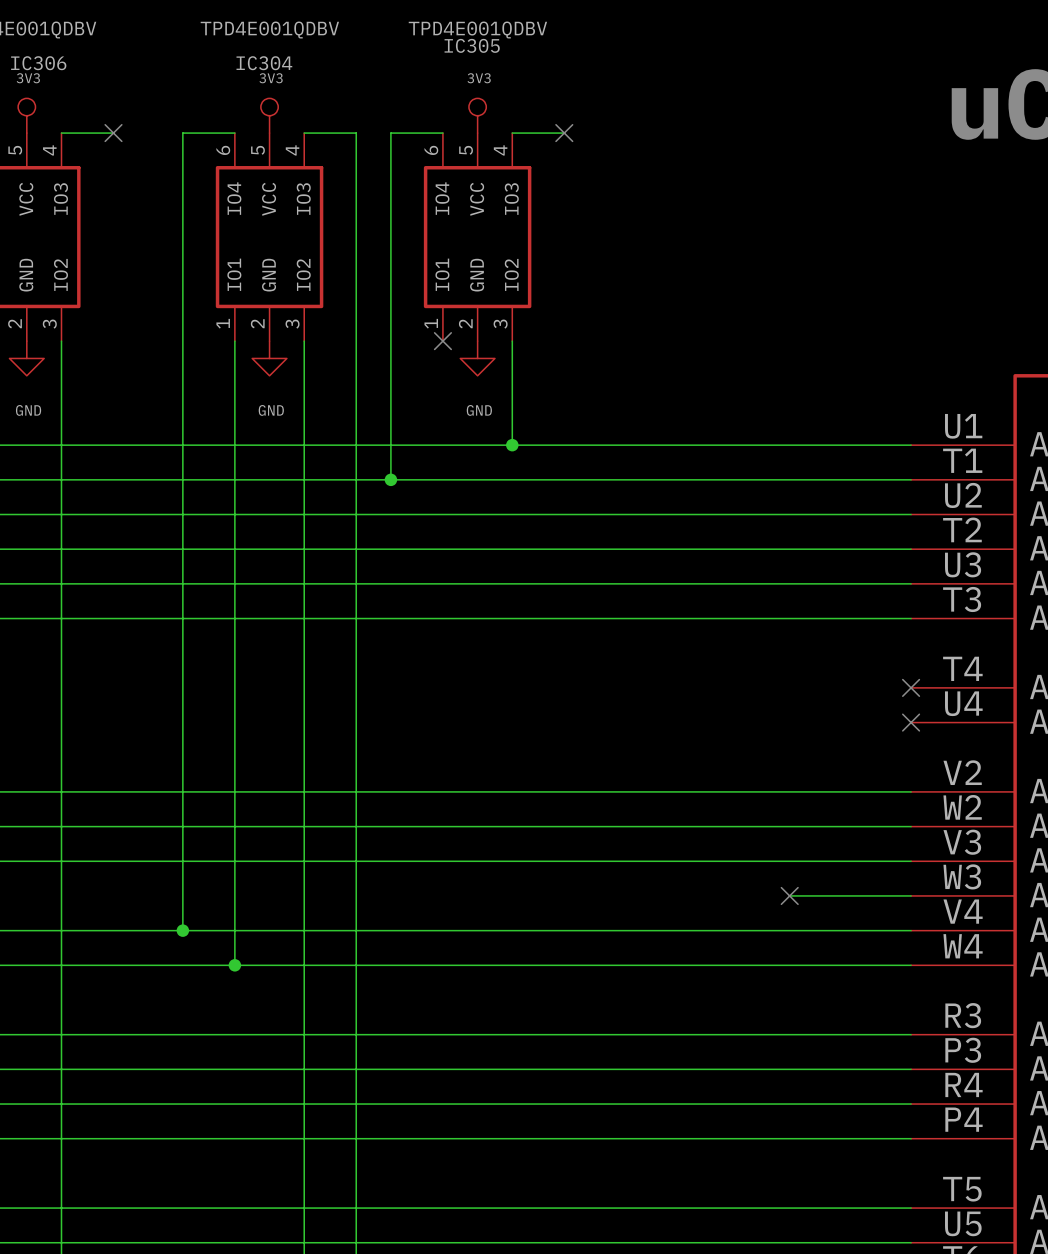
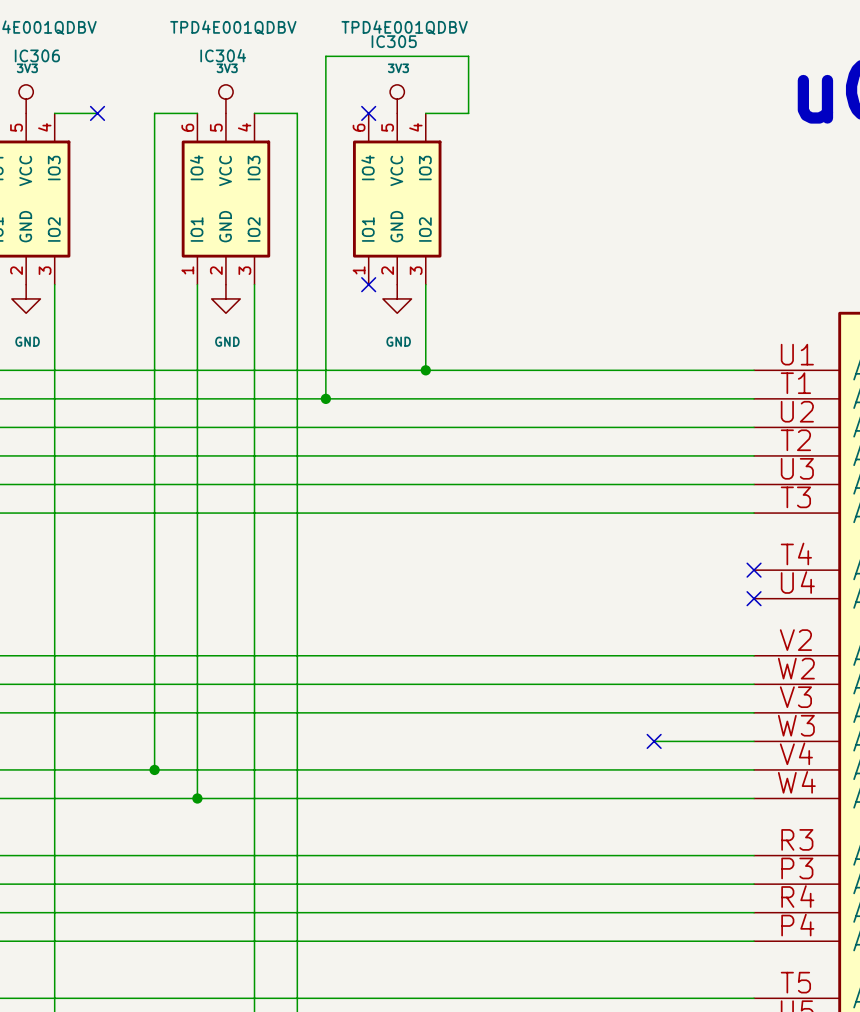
wire: (390, 133) (442, 133) -> (325, 113) (325, 56) (468, 56) (468, 113)
no-connect mark: none -> (368, 113)
no-connect mark: (564, 133) -> none

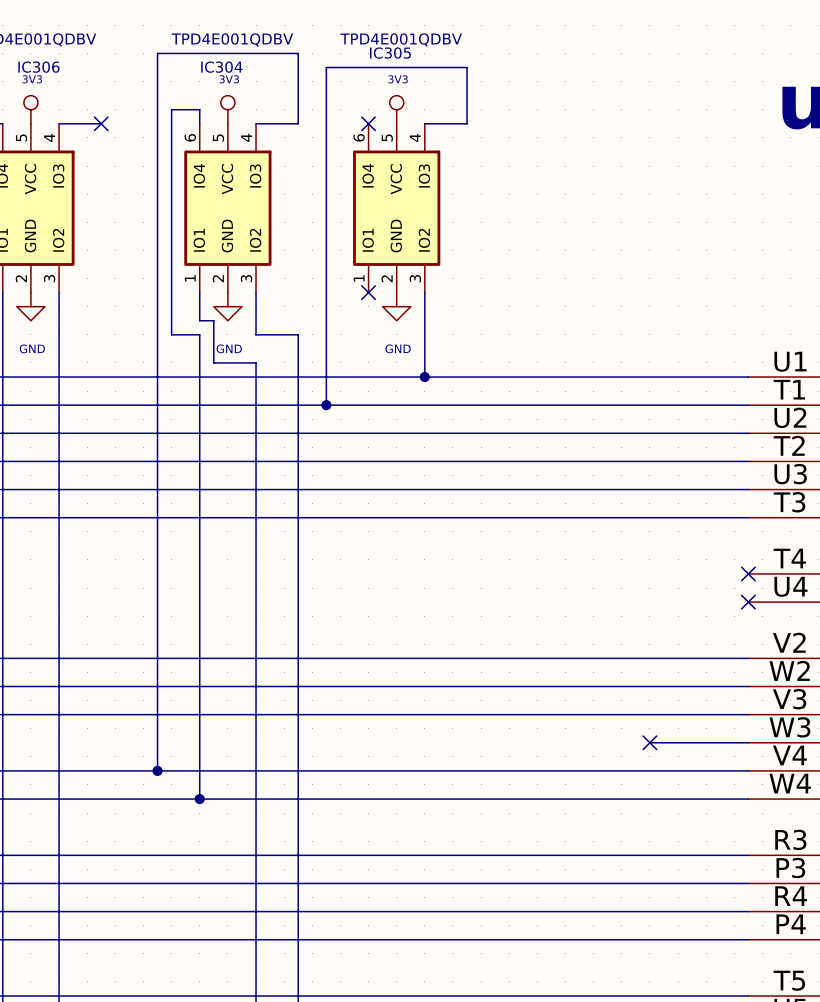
wire: (154, 113) (197, 113) -> (157, 123) (157, 53) (298, 53) (298, 123)
wire: none -> (199, 123) (199, 109) (171, 109) (171, 334) (199, 334)
wire: (297, 113) (297, 327) -> none
wire: (197, 313) (197, 327) -> (199, 320) (213, 320) (213, 362) (256, 362)
wire: (254, 327) (254, 356) -> (256, 334) (298, 334)

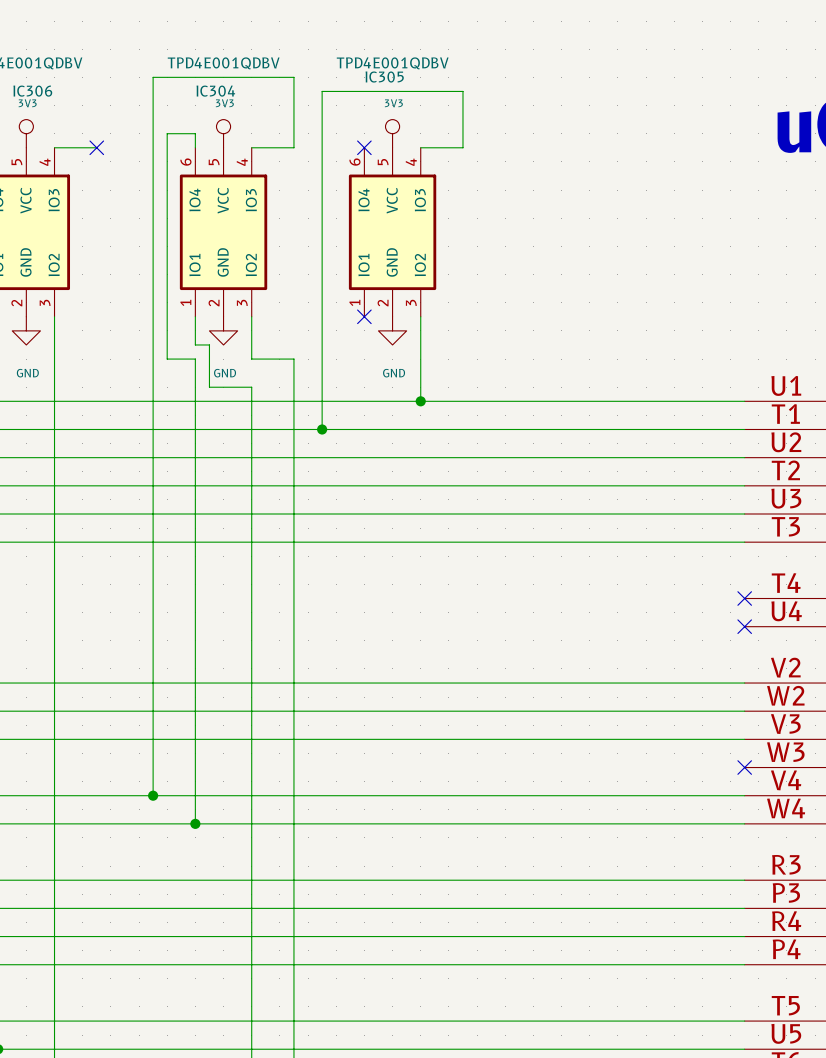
wire: (649, 742) (748, 742) -> none
no-connect mark: (649, 742) -> none
no-connect mark: none -> (744, 767)

